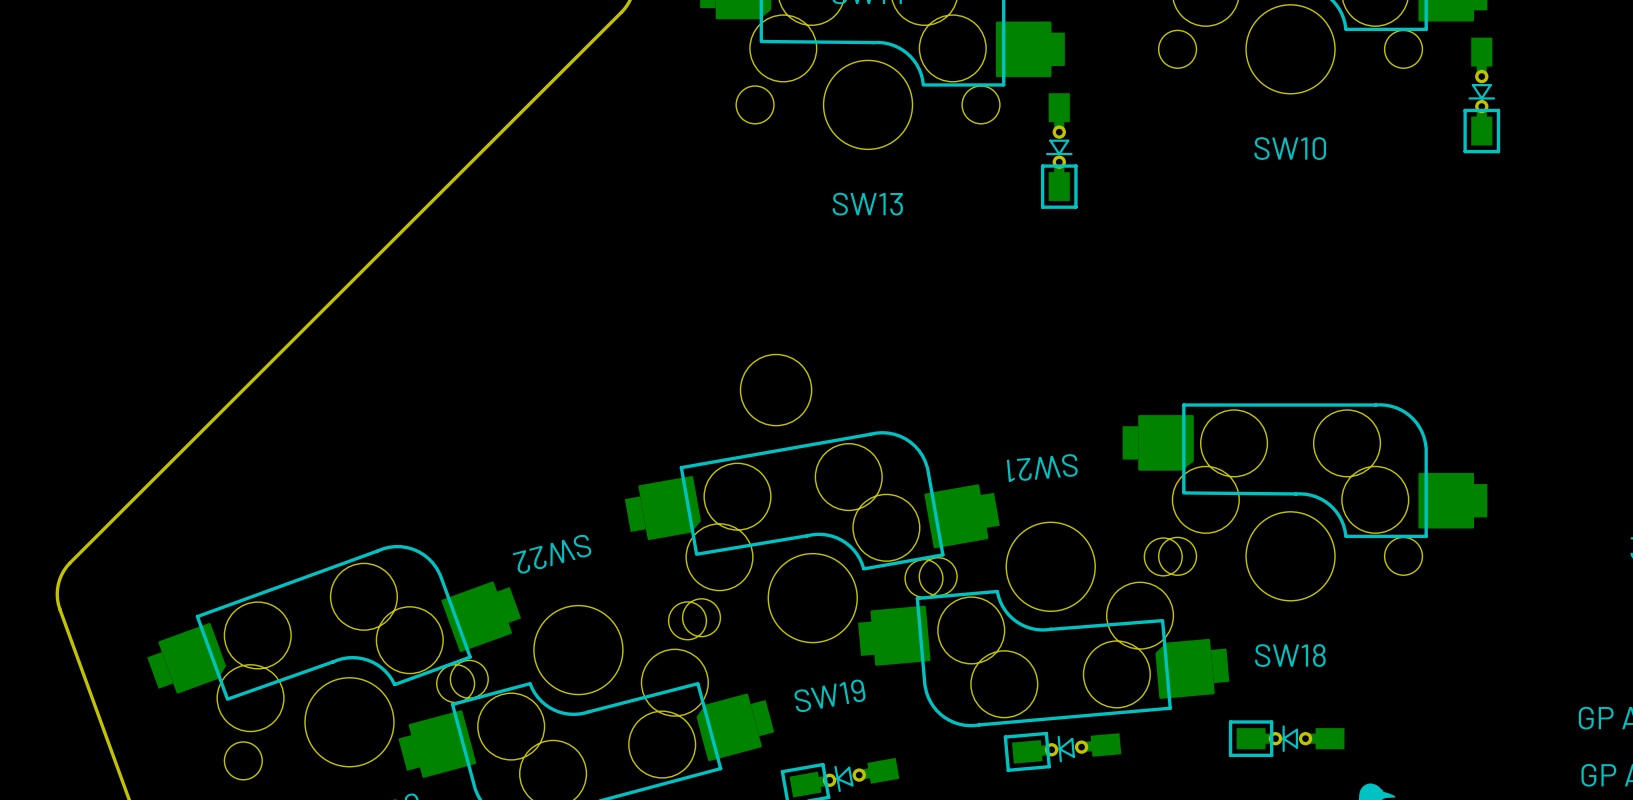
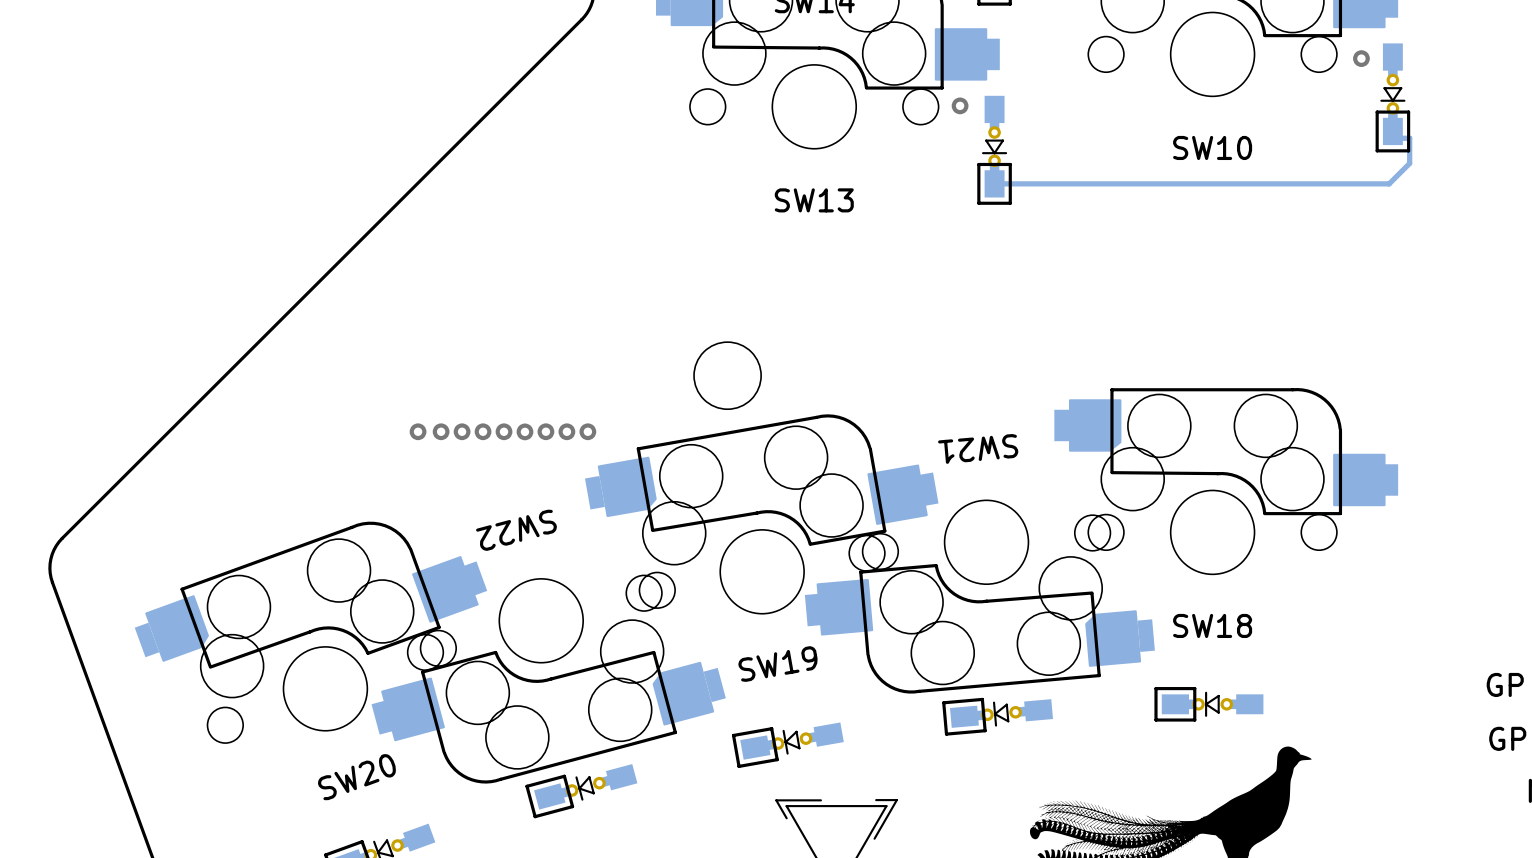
via: none -> (1361, 58)
via: none -> (960, 105)
track: none -> (1392, 131) (1399, 138) (1409, 138) (1409, 163) (1389, 183) (994, 183)
via: none -> (418, 431)
via: none -> (441, 431)
via: none -> (462, 431)
via: none -> (483, 431)
via: none -> (504, 431)
via: none -> (524, 431)
via: none -> (545, 431)
via: none -> (566, 431)
via: none -> (587, 431)

